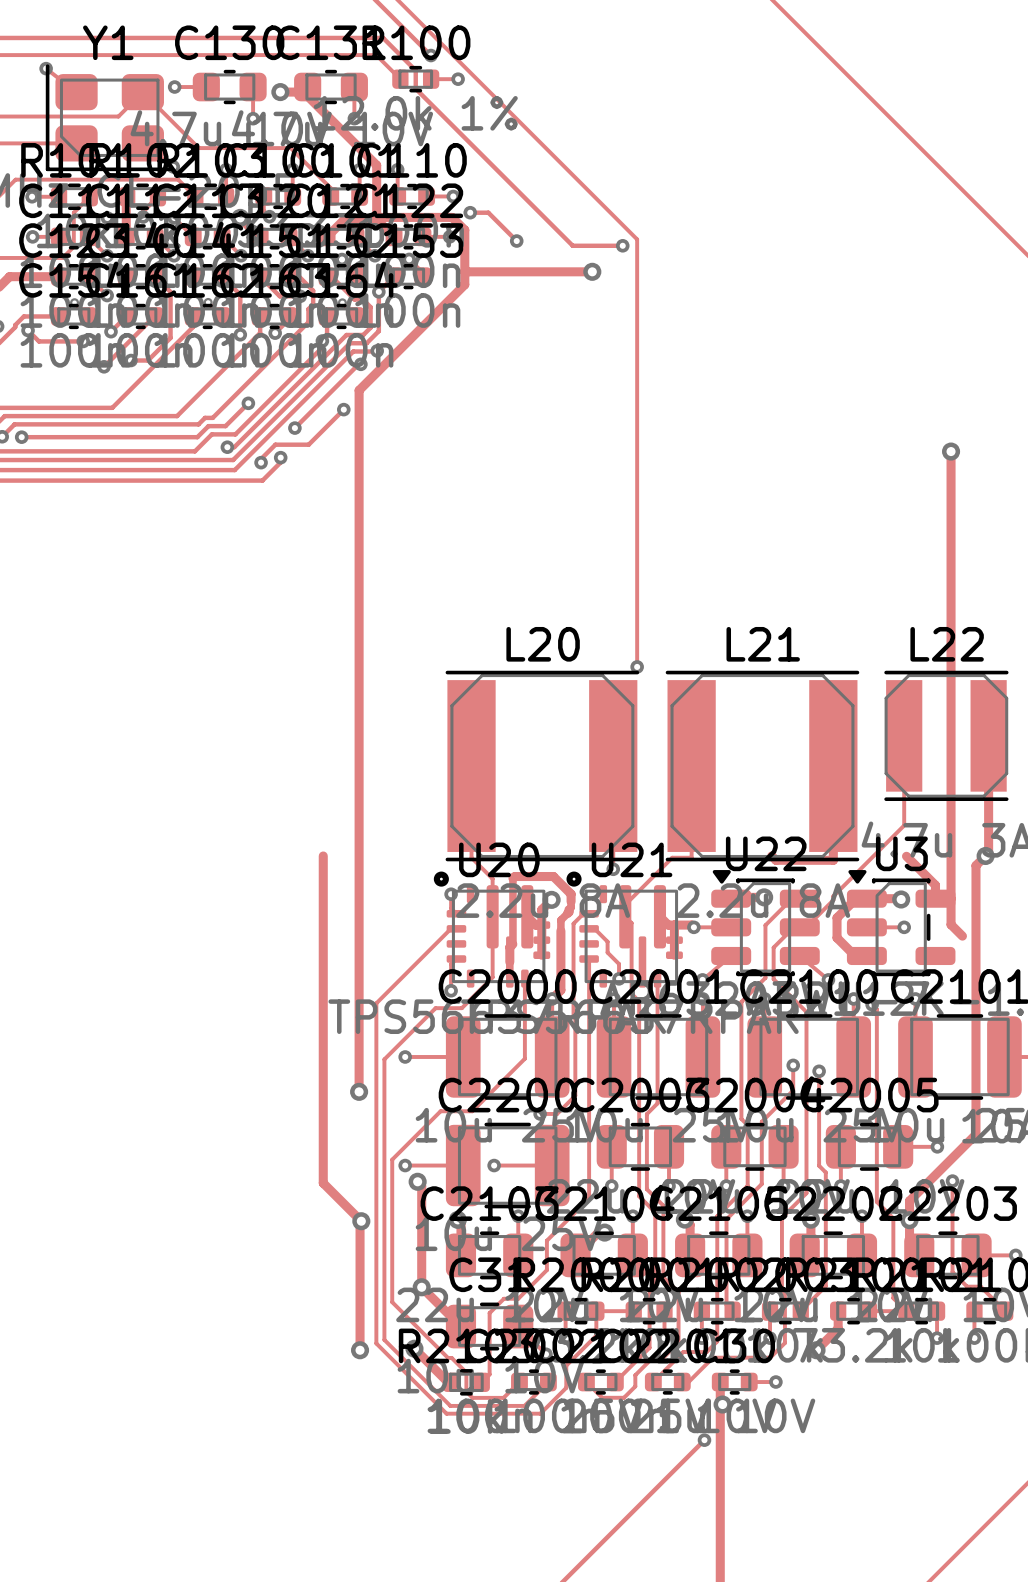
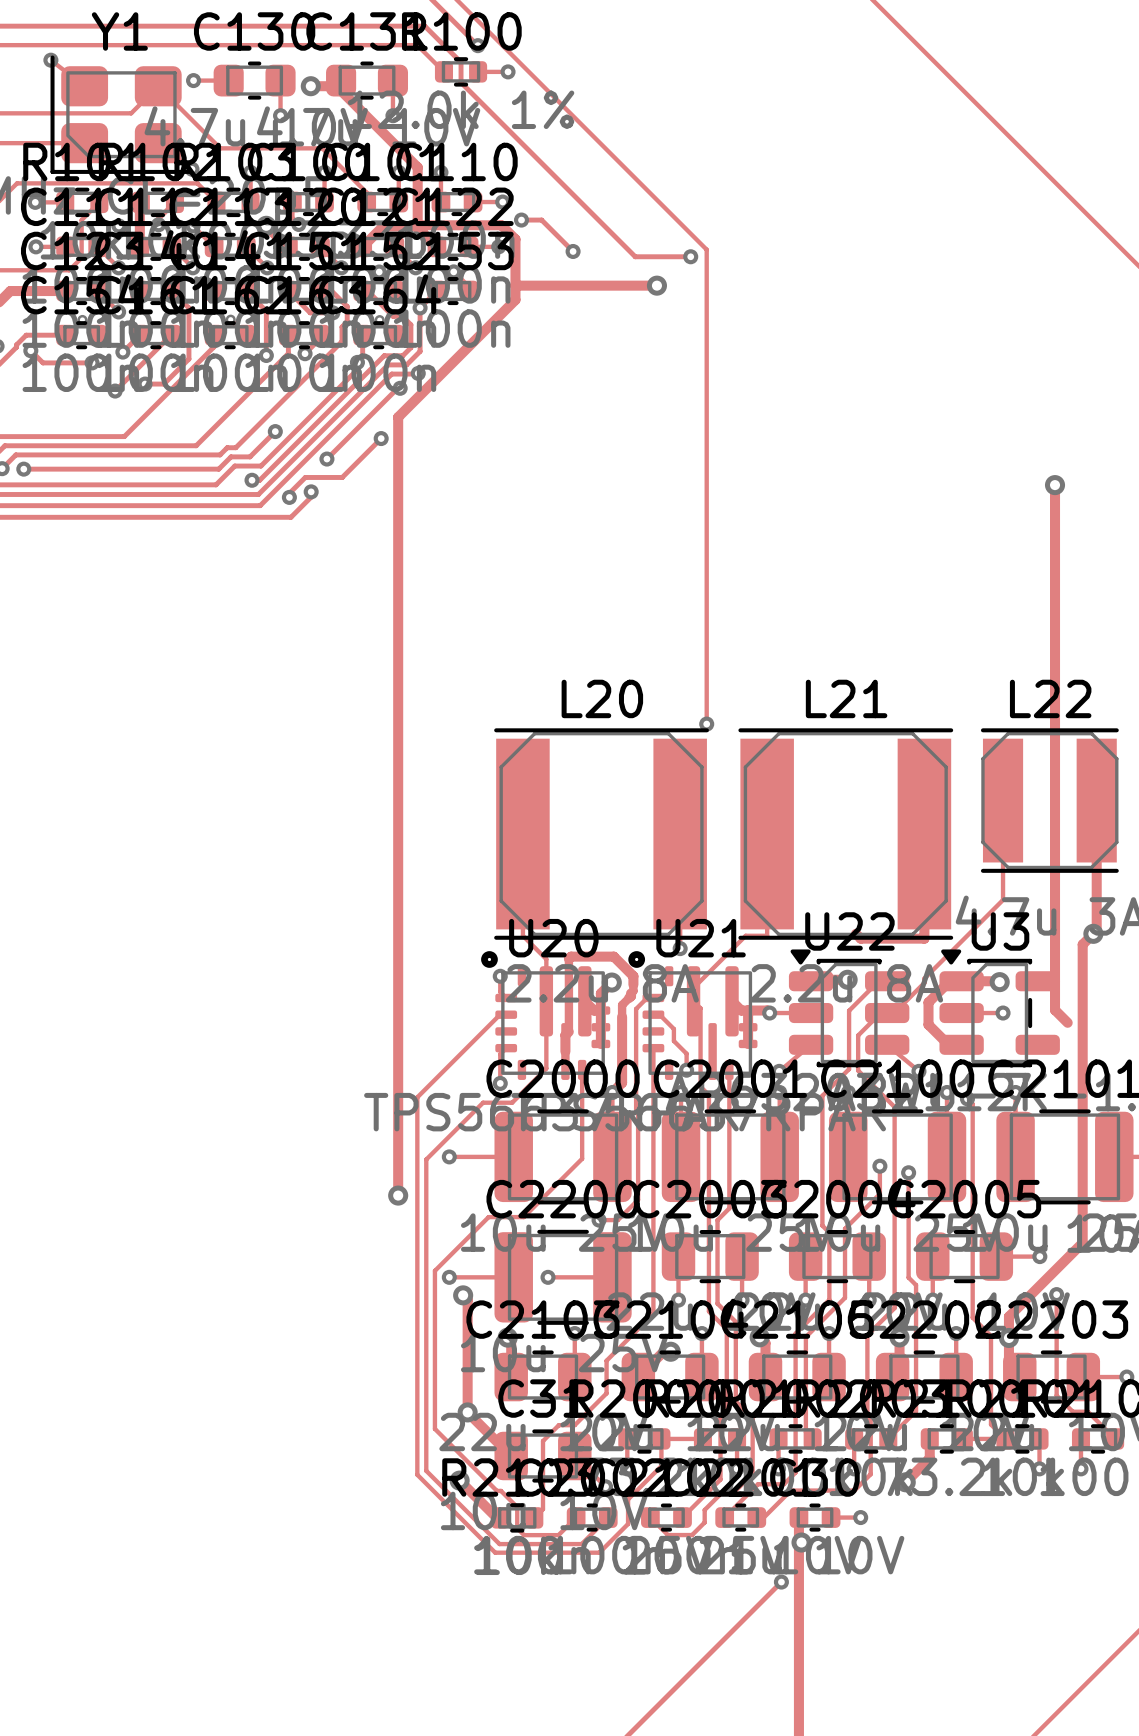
track: (323, 855) (323, 1183) (361, 1221) (360, 1350) -> none
track: (906, 856) (935, 885) (935, 898) -> none
via: (361, 1221) -> none
via: (360, 1350) -> none

